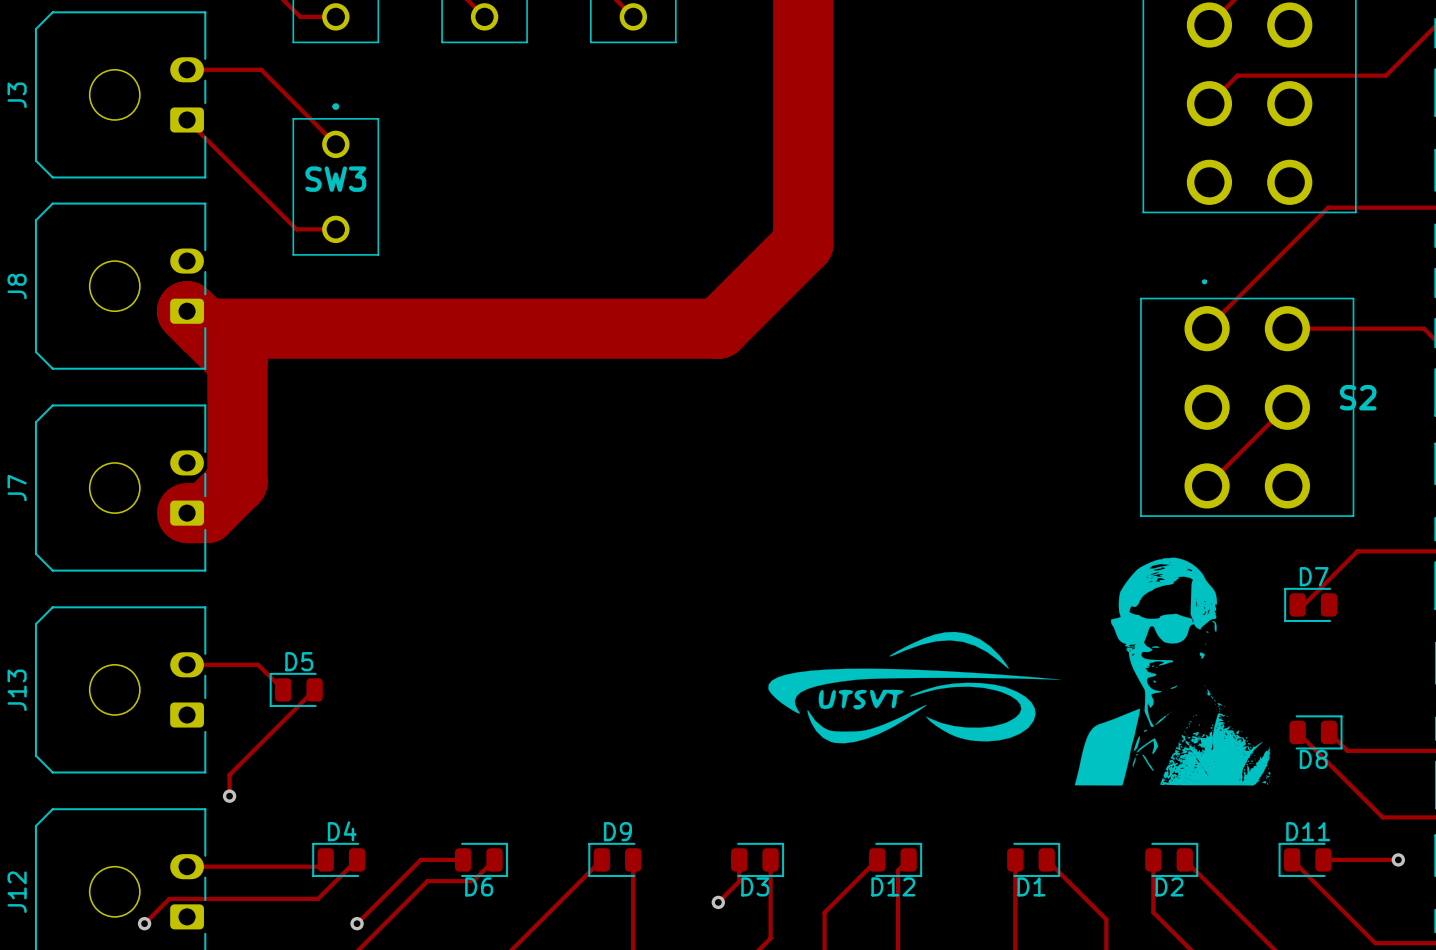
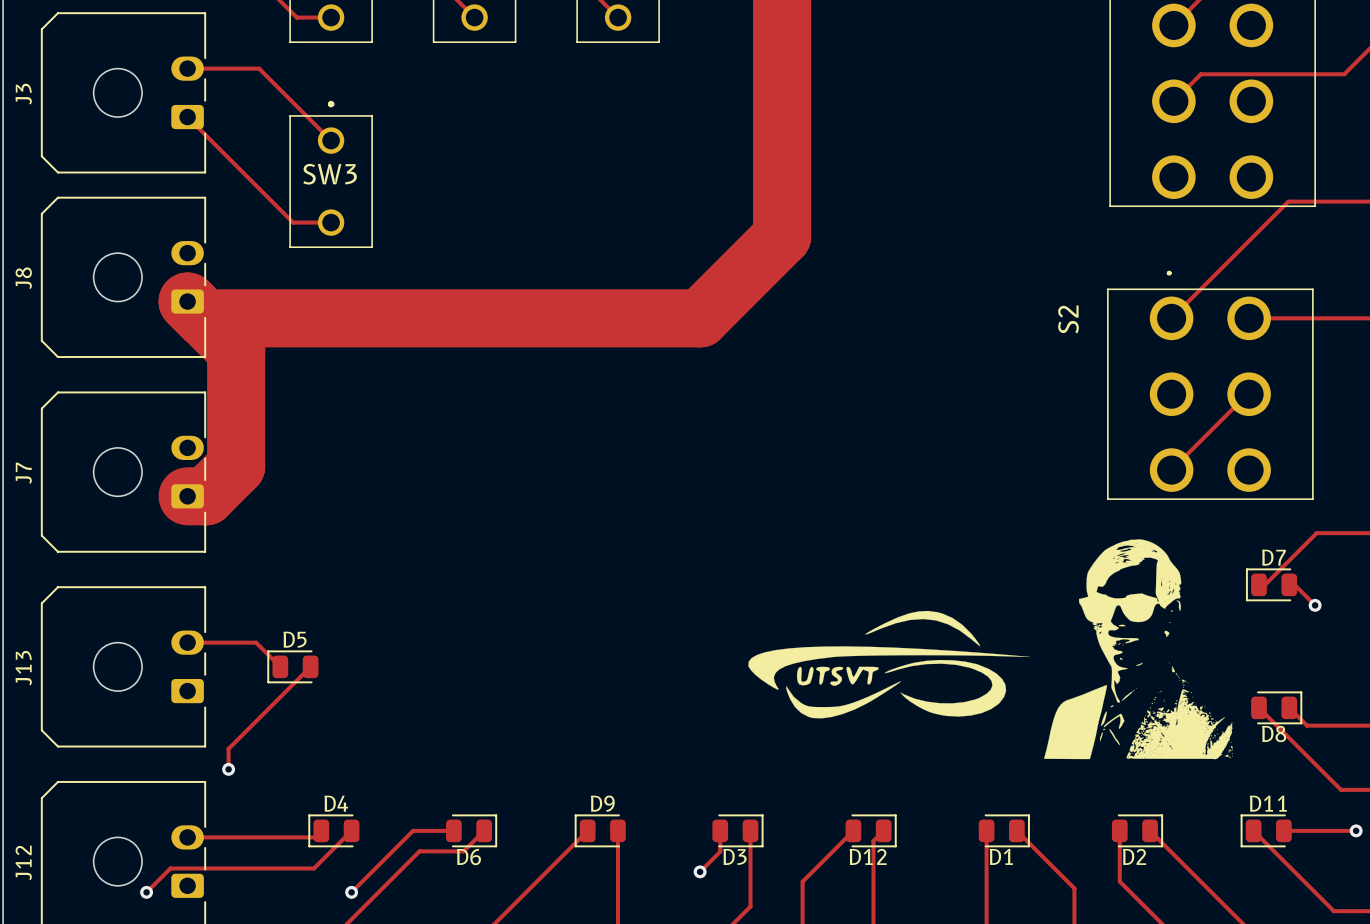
S2 name rotation: 0° (1358, 397) -> 90° counterclockwise (1068, 319)
S2 name position: S2 (1358, 397) -> S2 (1068, 319)
track: none -> (1289, 584) (1294, 584) (1315, 605)
via: none -> (1315, 605)

